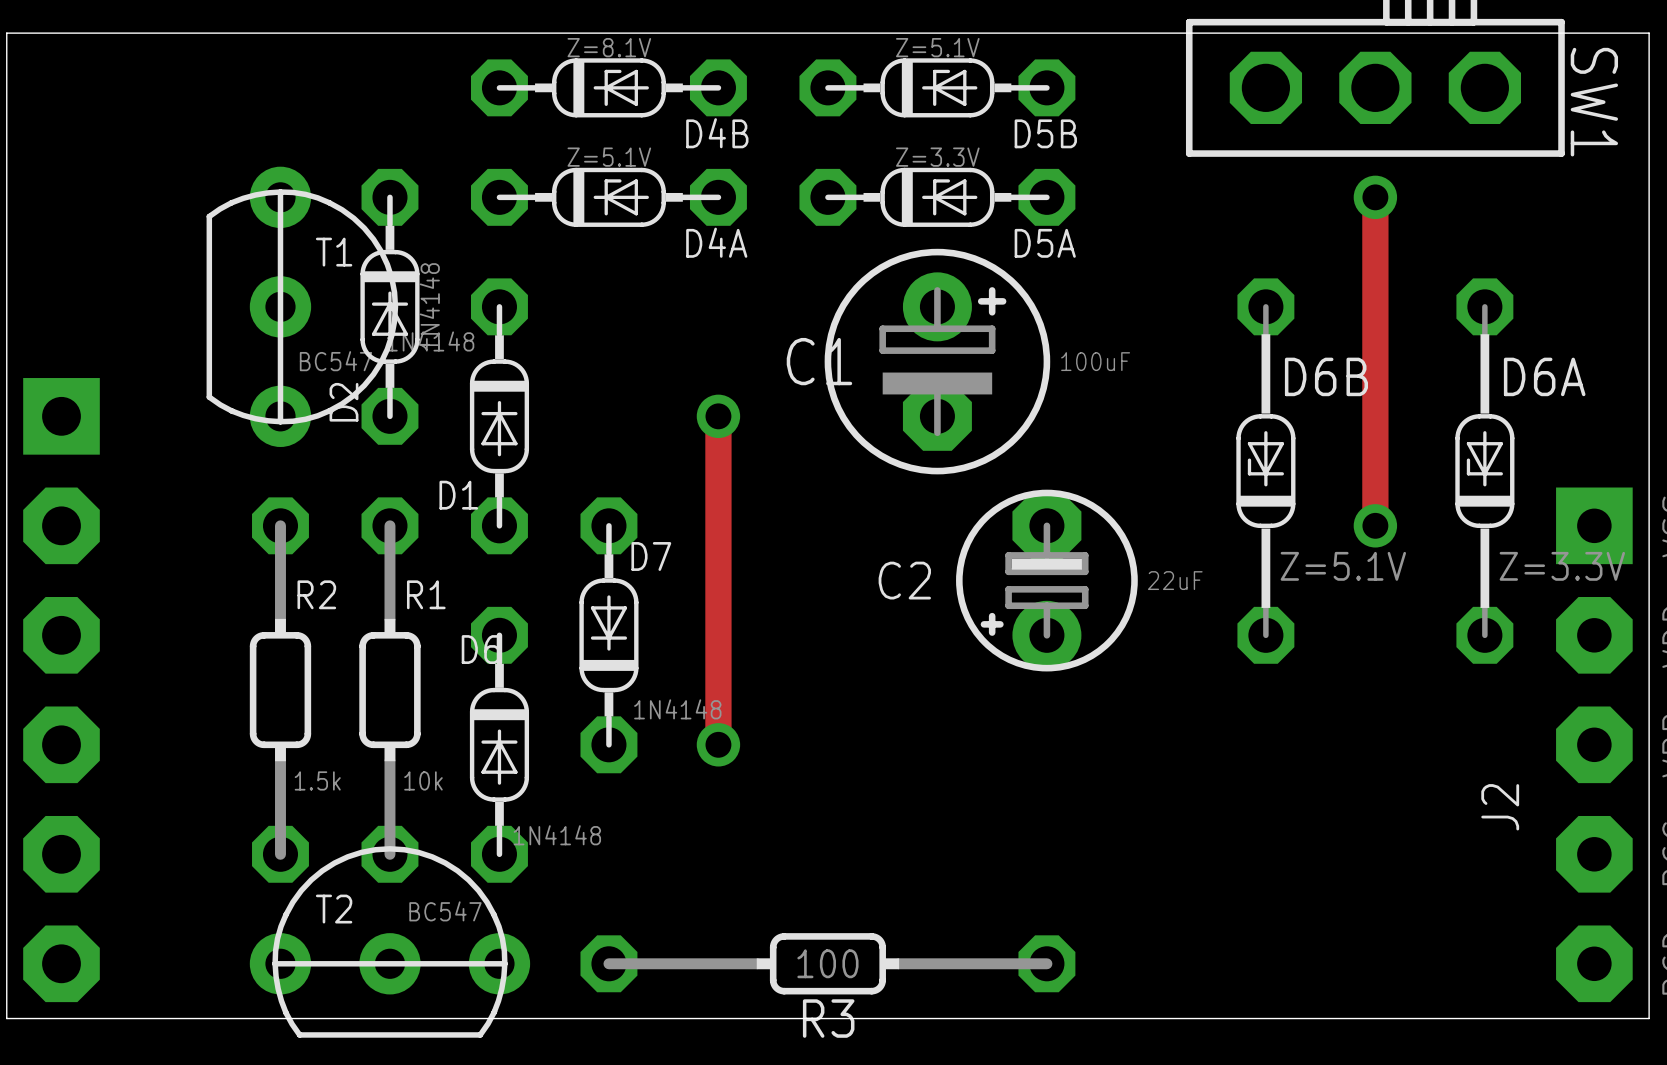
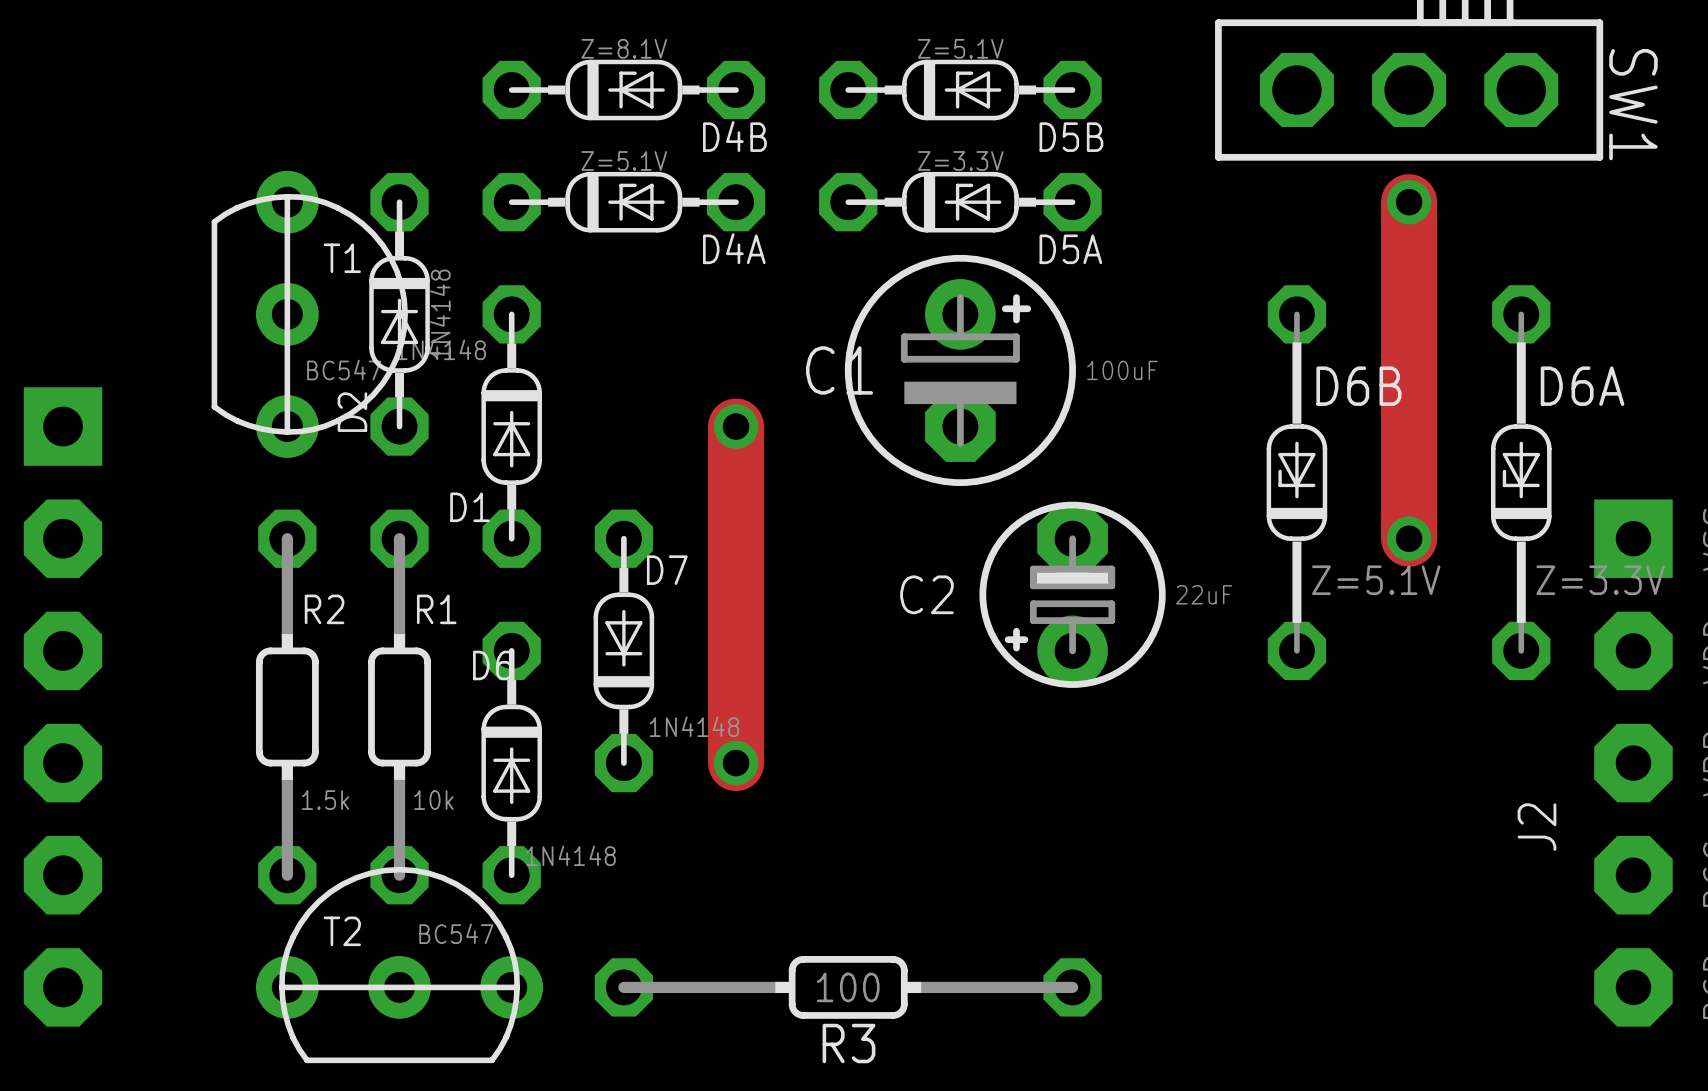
board edge: (6, 33) (1649, 33) (1649, 1018) (6, 1018) (6, 33) -> none
track width: thin (1375, 197) (1375, 525) -> thick (1409, 202) (1409, 538)
track width: thin (718, 416) (718, 744) -> thick (736, 426) (736, 763)

